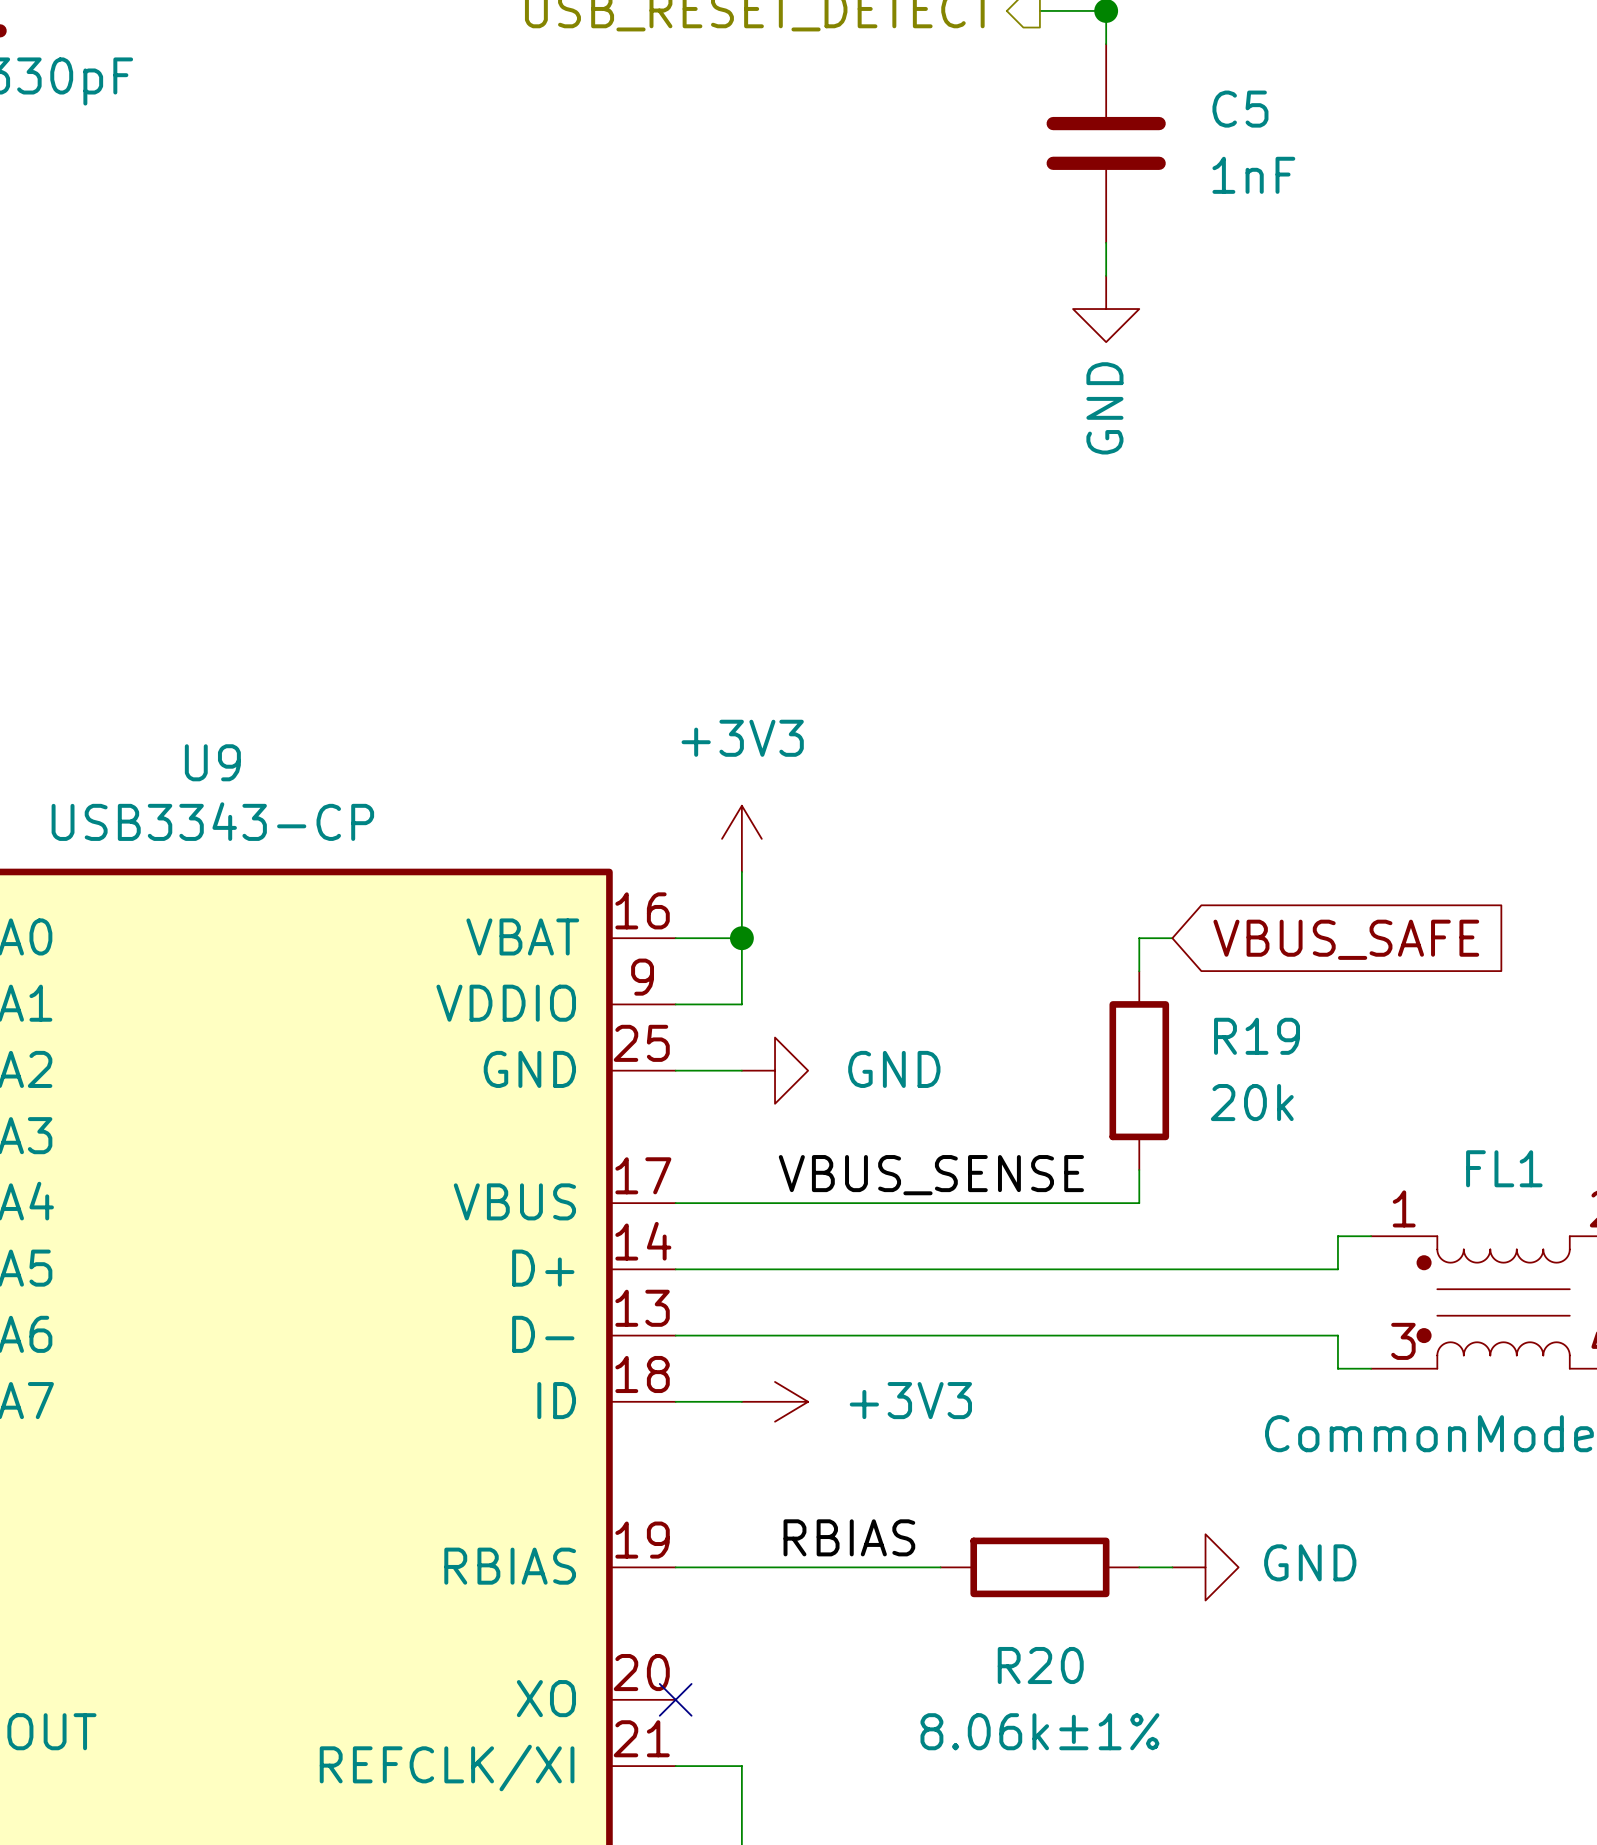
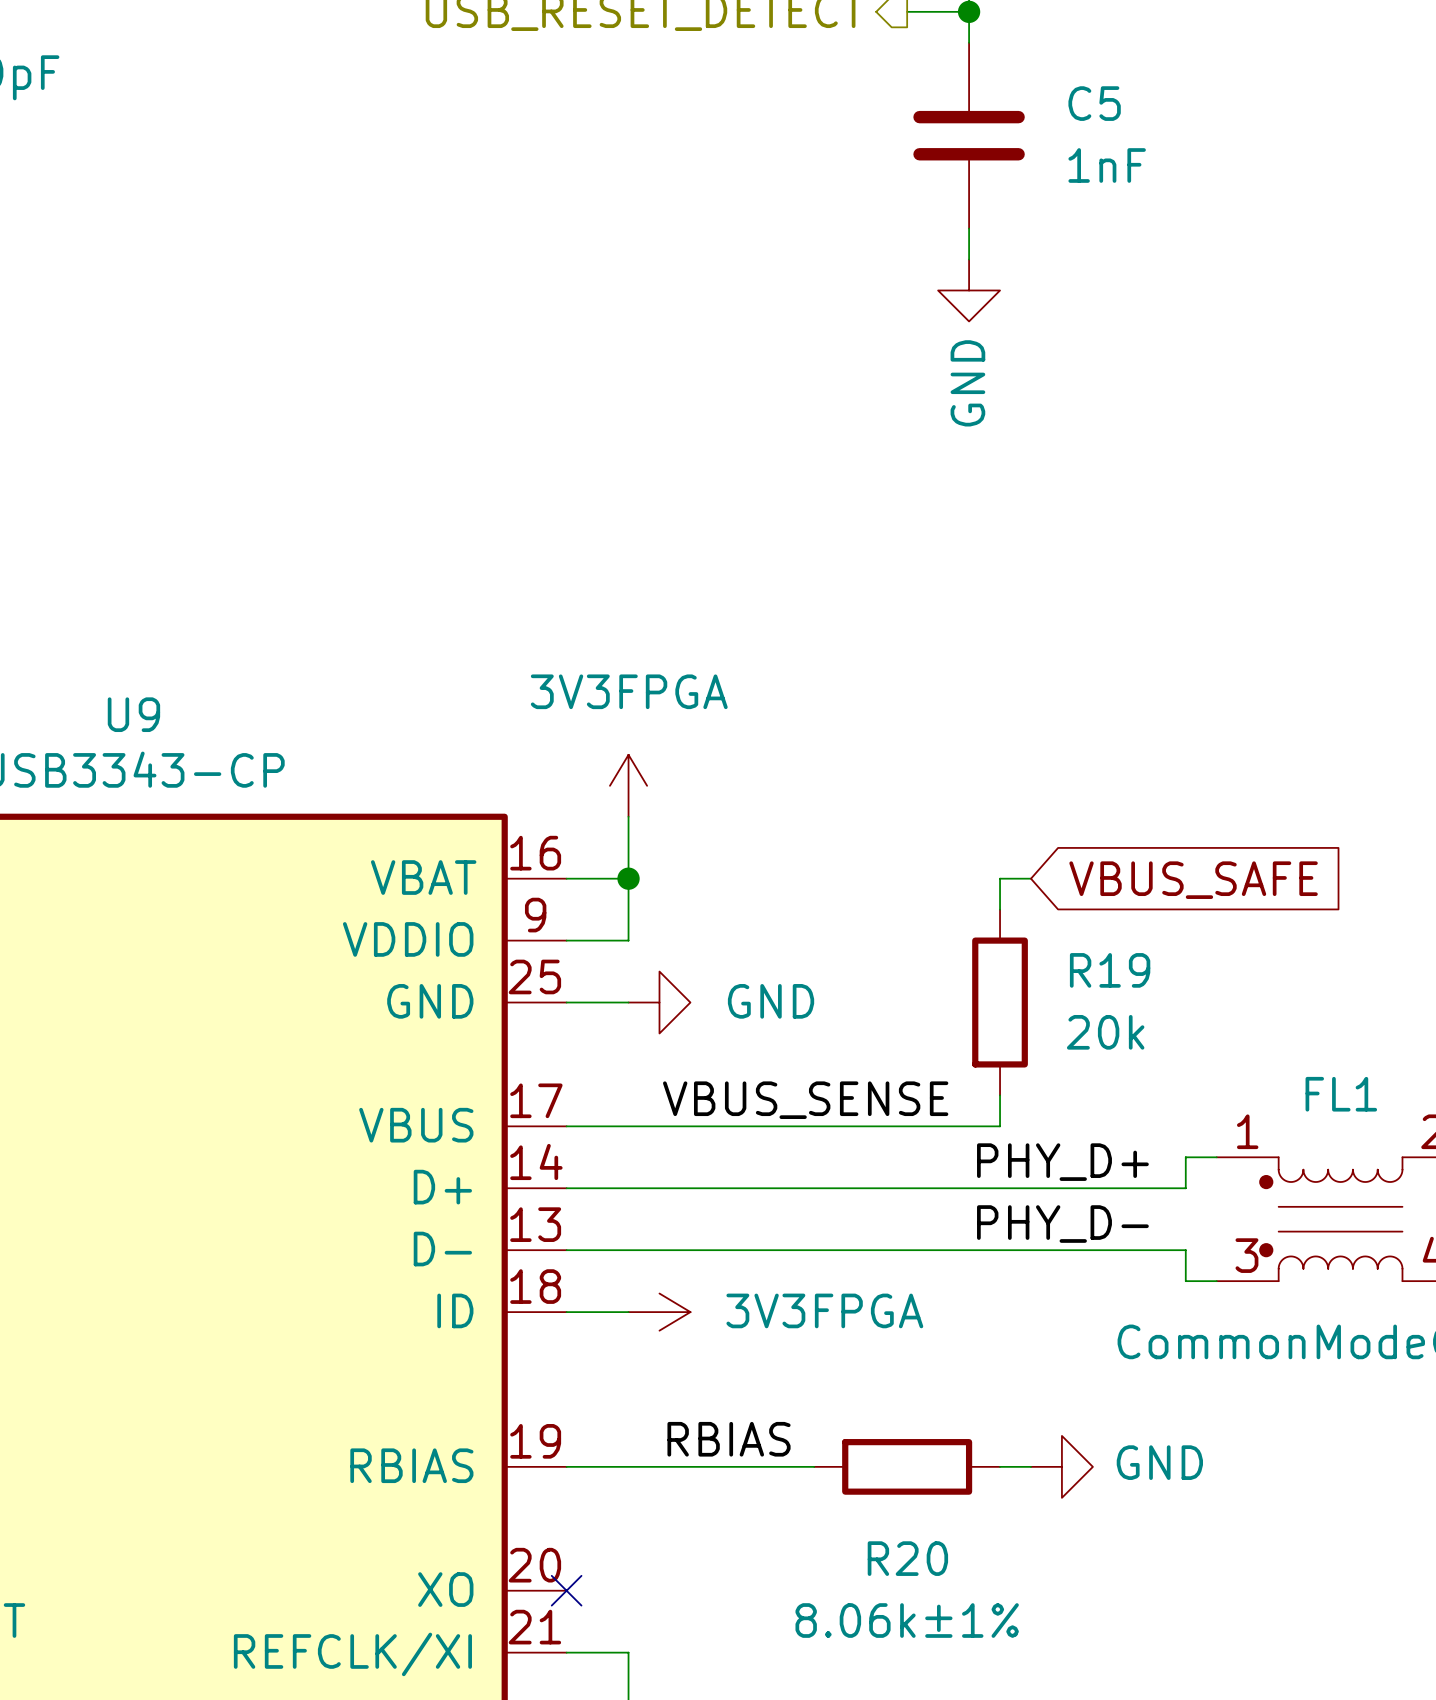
power symbol: +3V3 (741, 838) -> 3V3FPGA (628, 785)
label: none -> PHY_D+ (1062, 1162)
label: none -> PHY_D- (1062, 1224)
power symbol: +3V3 (775, 1401) -> 3V3FPGA (659, 1312)

